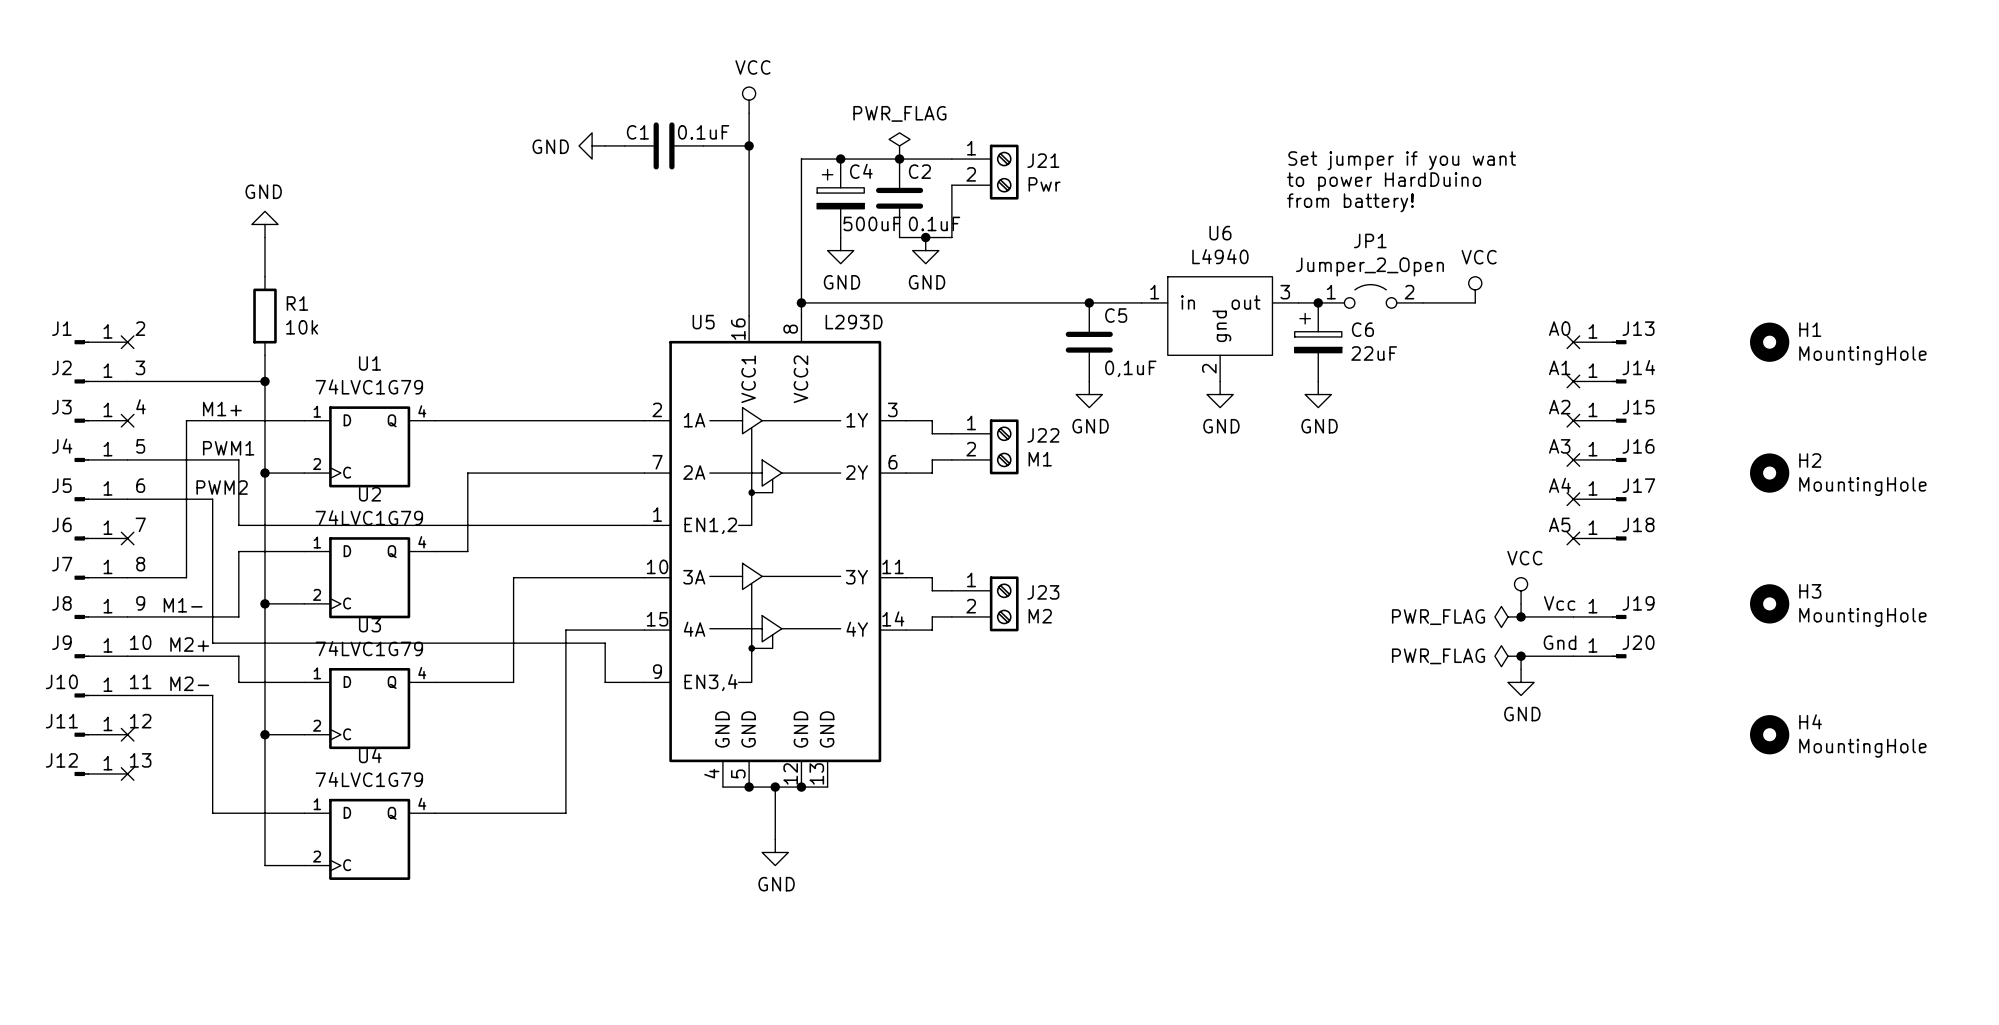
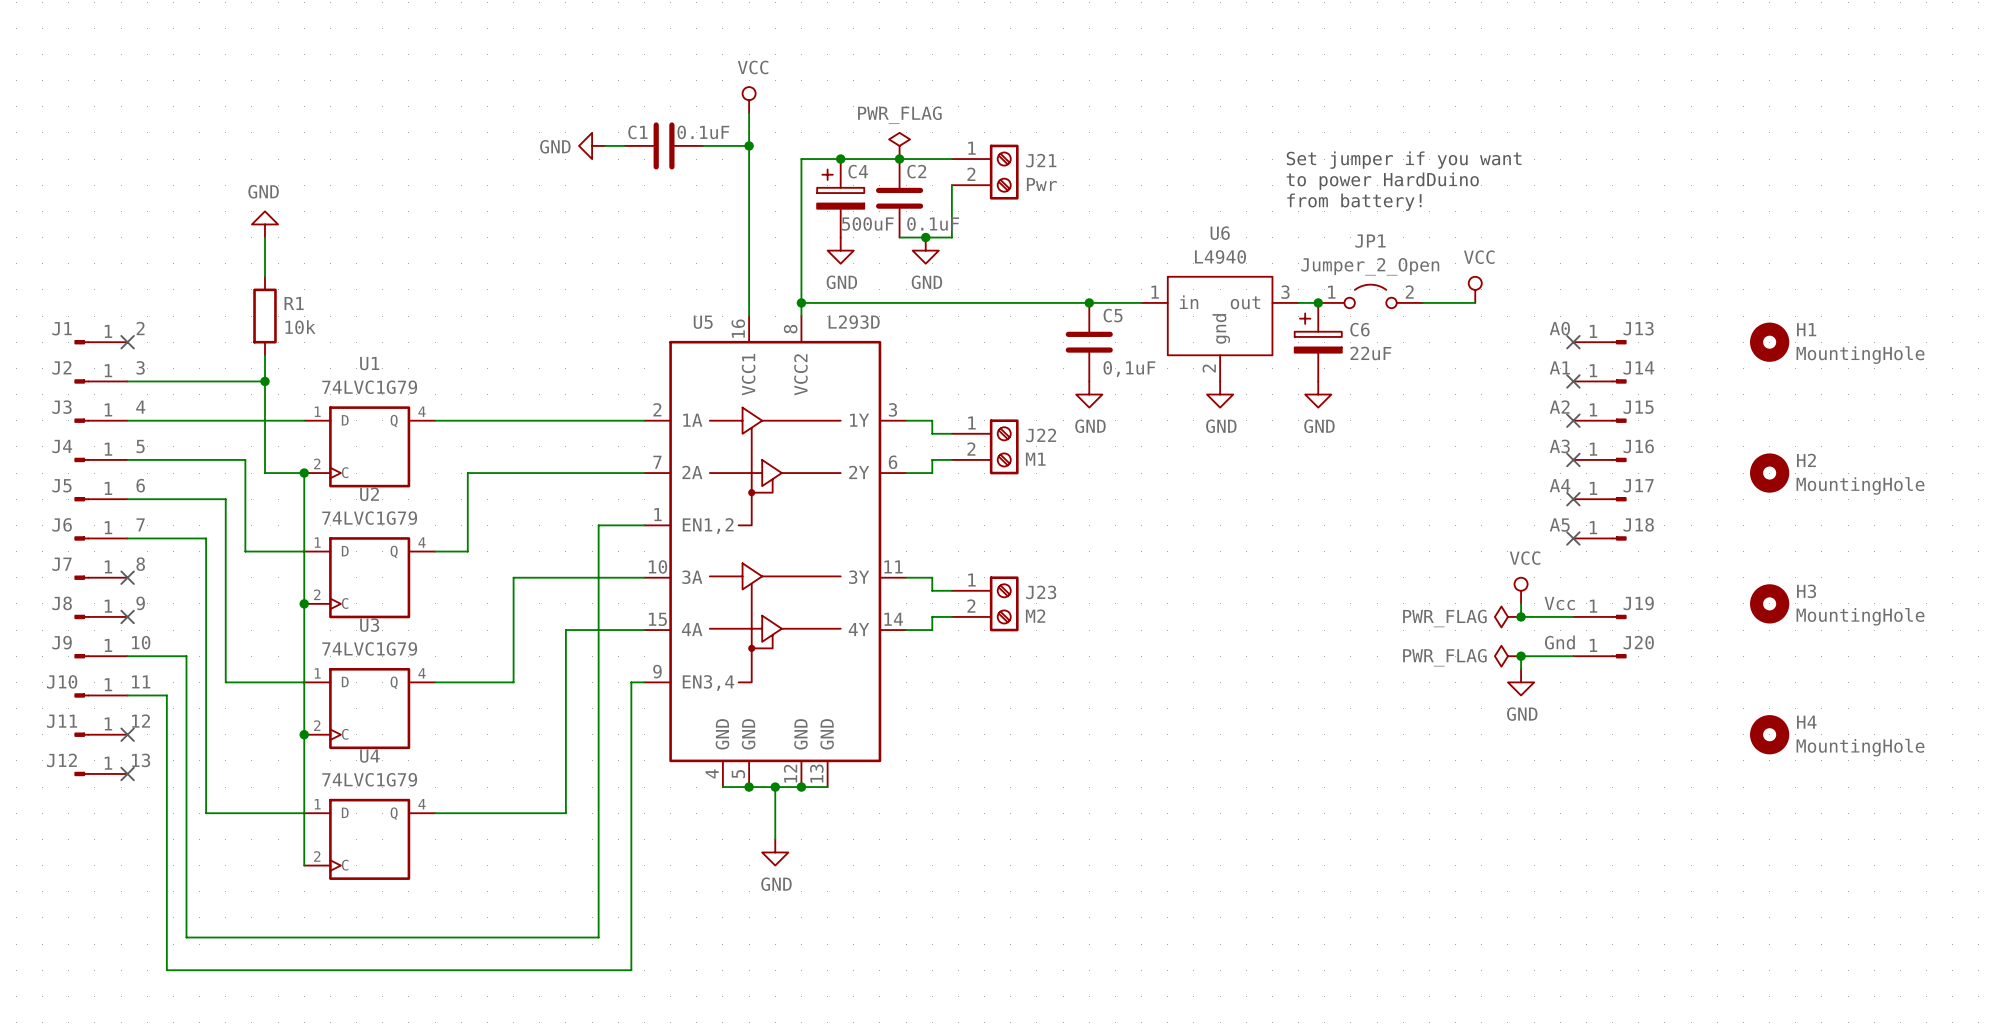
label: M1+ (222, 409) -> none
no-connect mark: (127, 420) -> none
wire: (186, 420) (186, 577) (127, 577) -> (186, 420) (127, 420)
label: PWM1 (228, 448) -> none
wire: (238, 459) (238, 525) (598, 525) -> (186, 656) (186, 937) (598, 937) (598, 525)
wire: (264, 473) (264, 865) (304, 865) -> (304, 473) (304, 865)
junction position: (264, 473) -> (304, 473)
label: PWM2 (222, 487) -> none
wire: (212, 499) (212, 643) (605, 643) (605, 682) (631, 682) -> (166, 695) (166, 970) (631, 970) (631, 682)
no-connect mark: (127, 538) -> none
wire: (245, 551) (238, 551) (238, 616) (127, 616) -> (245, 551) (245, 459) (238, 459)
no-connect mark: none -> (127, 577)
wire: (264, 603) (304, 603) -> none
junction position: (264, 603) -> (304, 603)
label: M1- (183, 605) -> none
no-connect mark: none -> (127, 616)
label: M2+ (189, 644) -> none
wire: (186, 656) (238, 656) (238, 682) -> (212, 499) (225, 499) (225, 682) (238, 682)
label: M2- (189, 683) -> none
wire: (166, 695) (212, 695) (212, 813) -> (127, 538) (206, 538) (206, 813) (212, 813)
wire: (264, 734) (304, 734) -> none
junction position: (264, 734) -> (304, 734)

